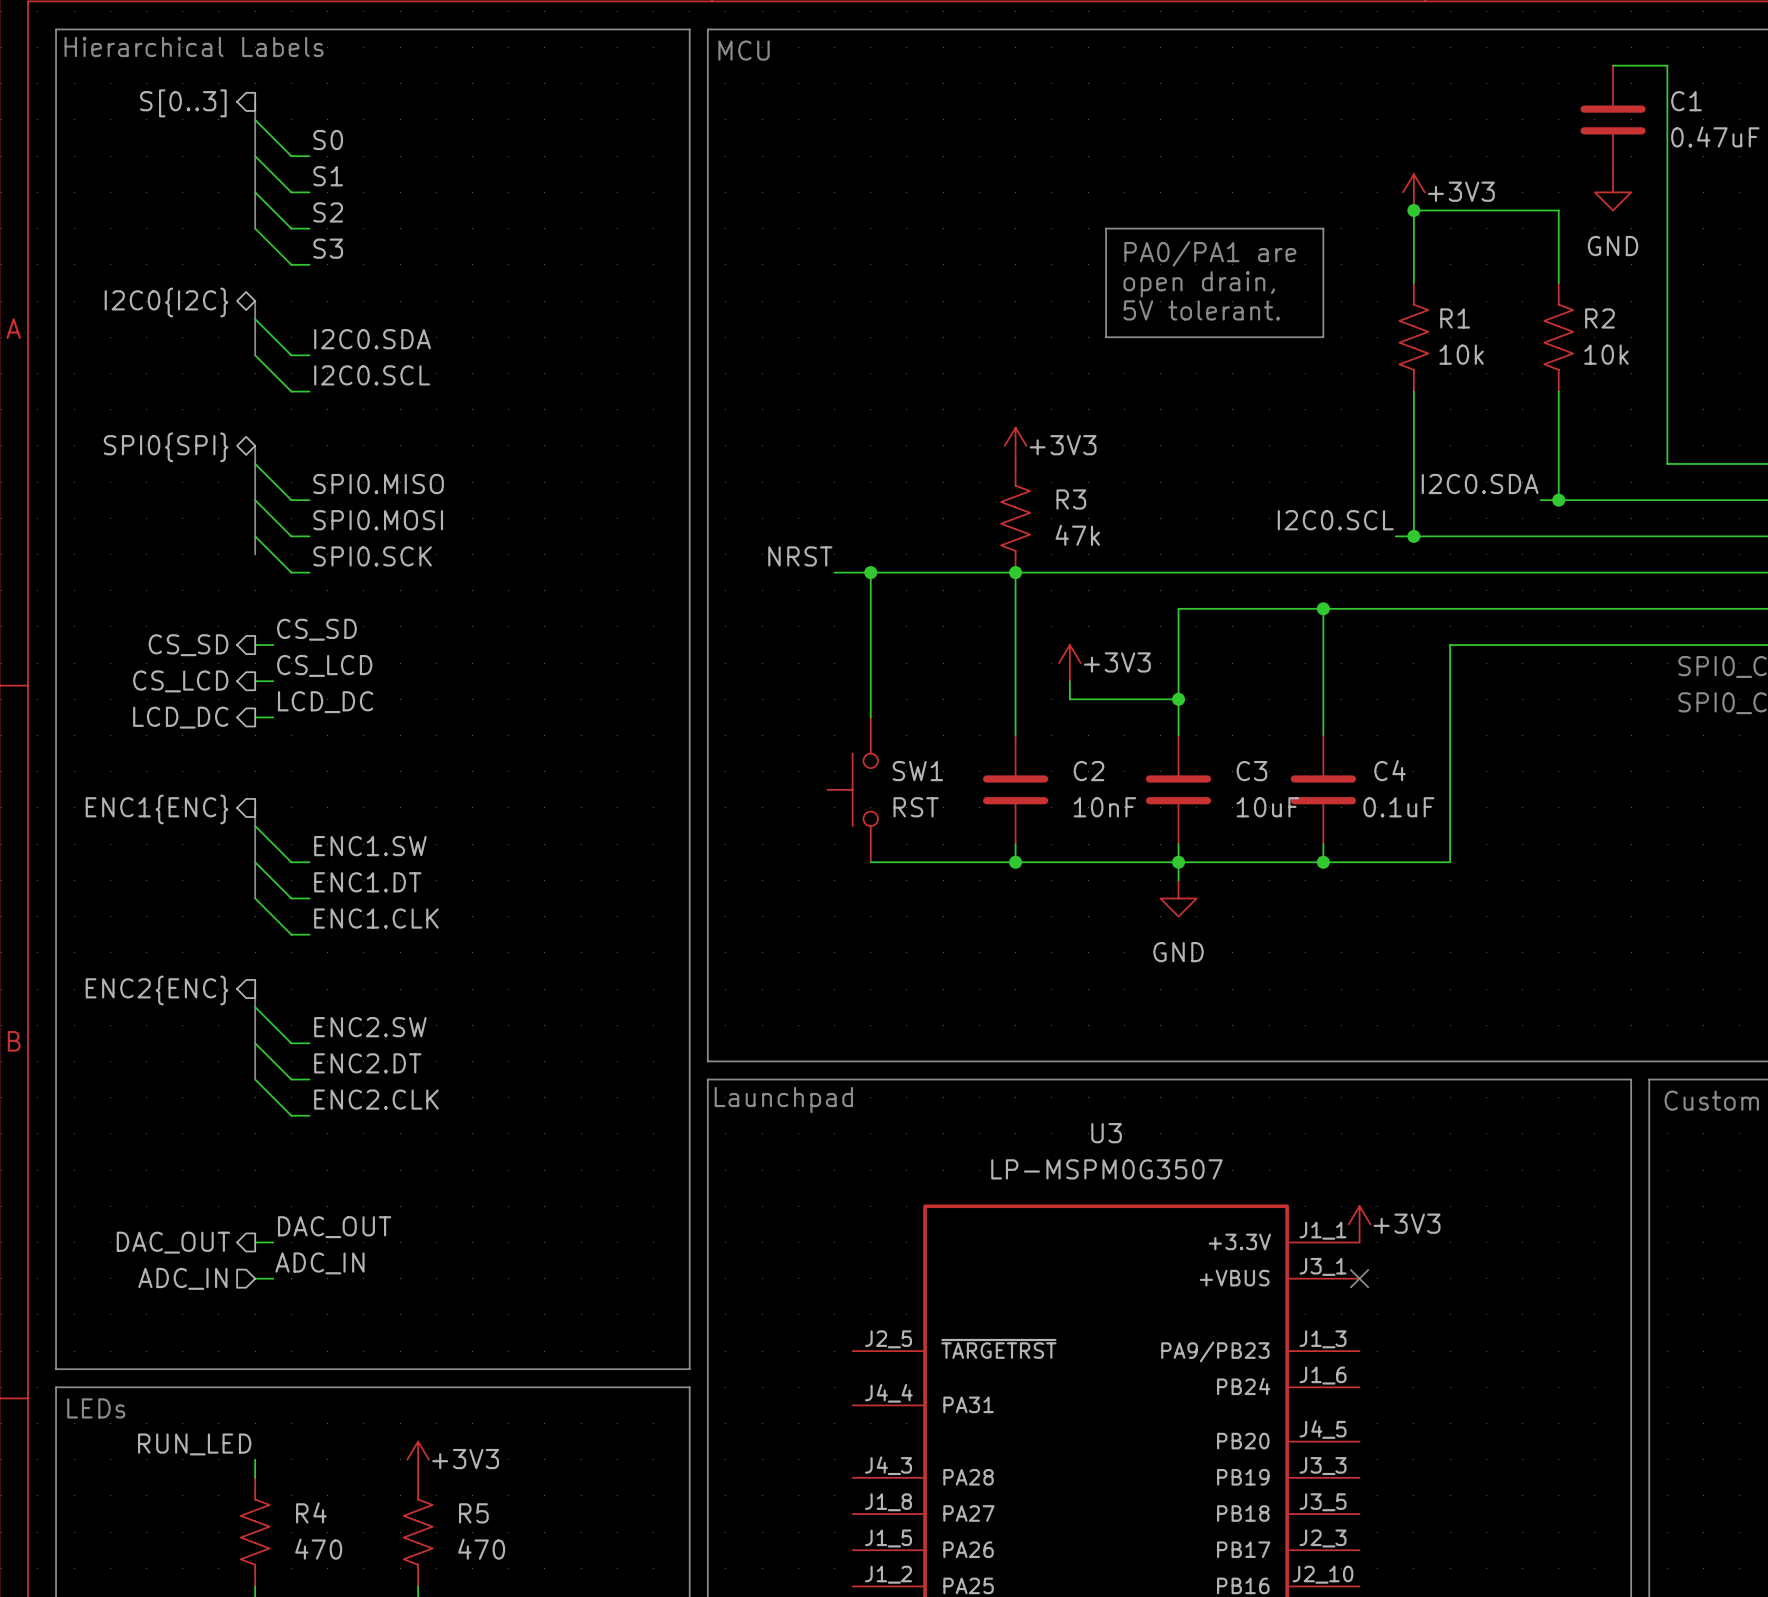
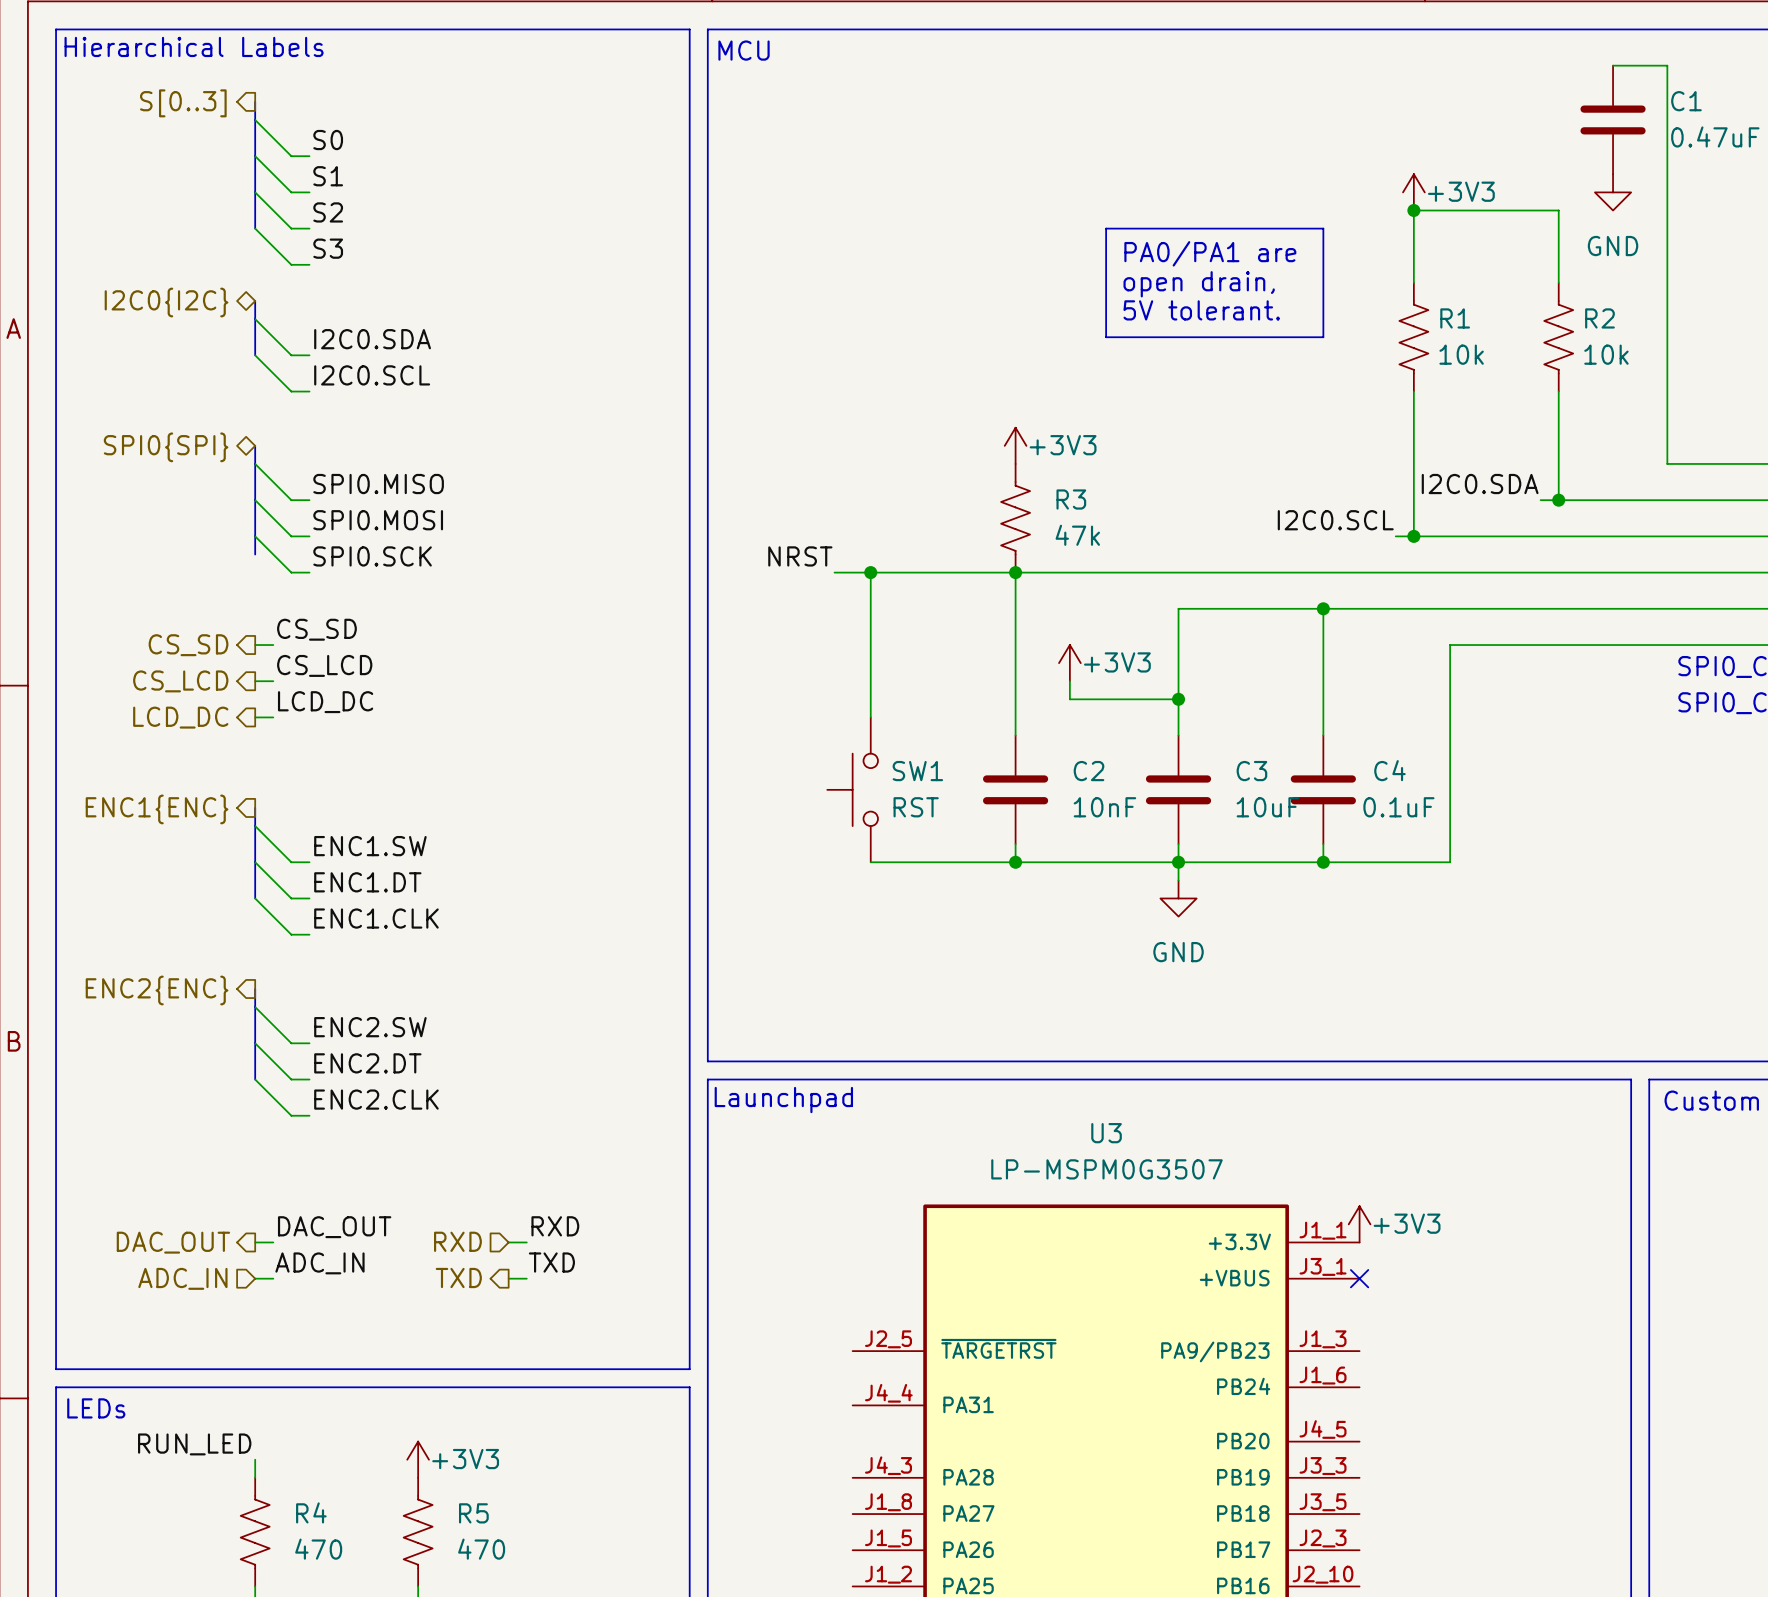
label: none -> RXD (555, 1226)
hierarchical label: none -> RXD (457, 1241)
wire: none -> (508, 1242) (526, 1242)
label: none -> TXD (551, 1262)
hierarchical label: none -> TXD (458, 1278)
wire: none -> (508, 1278) (526, 1278)

